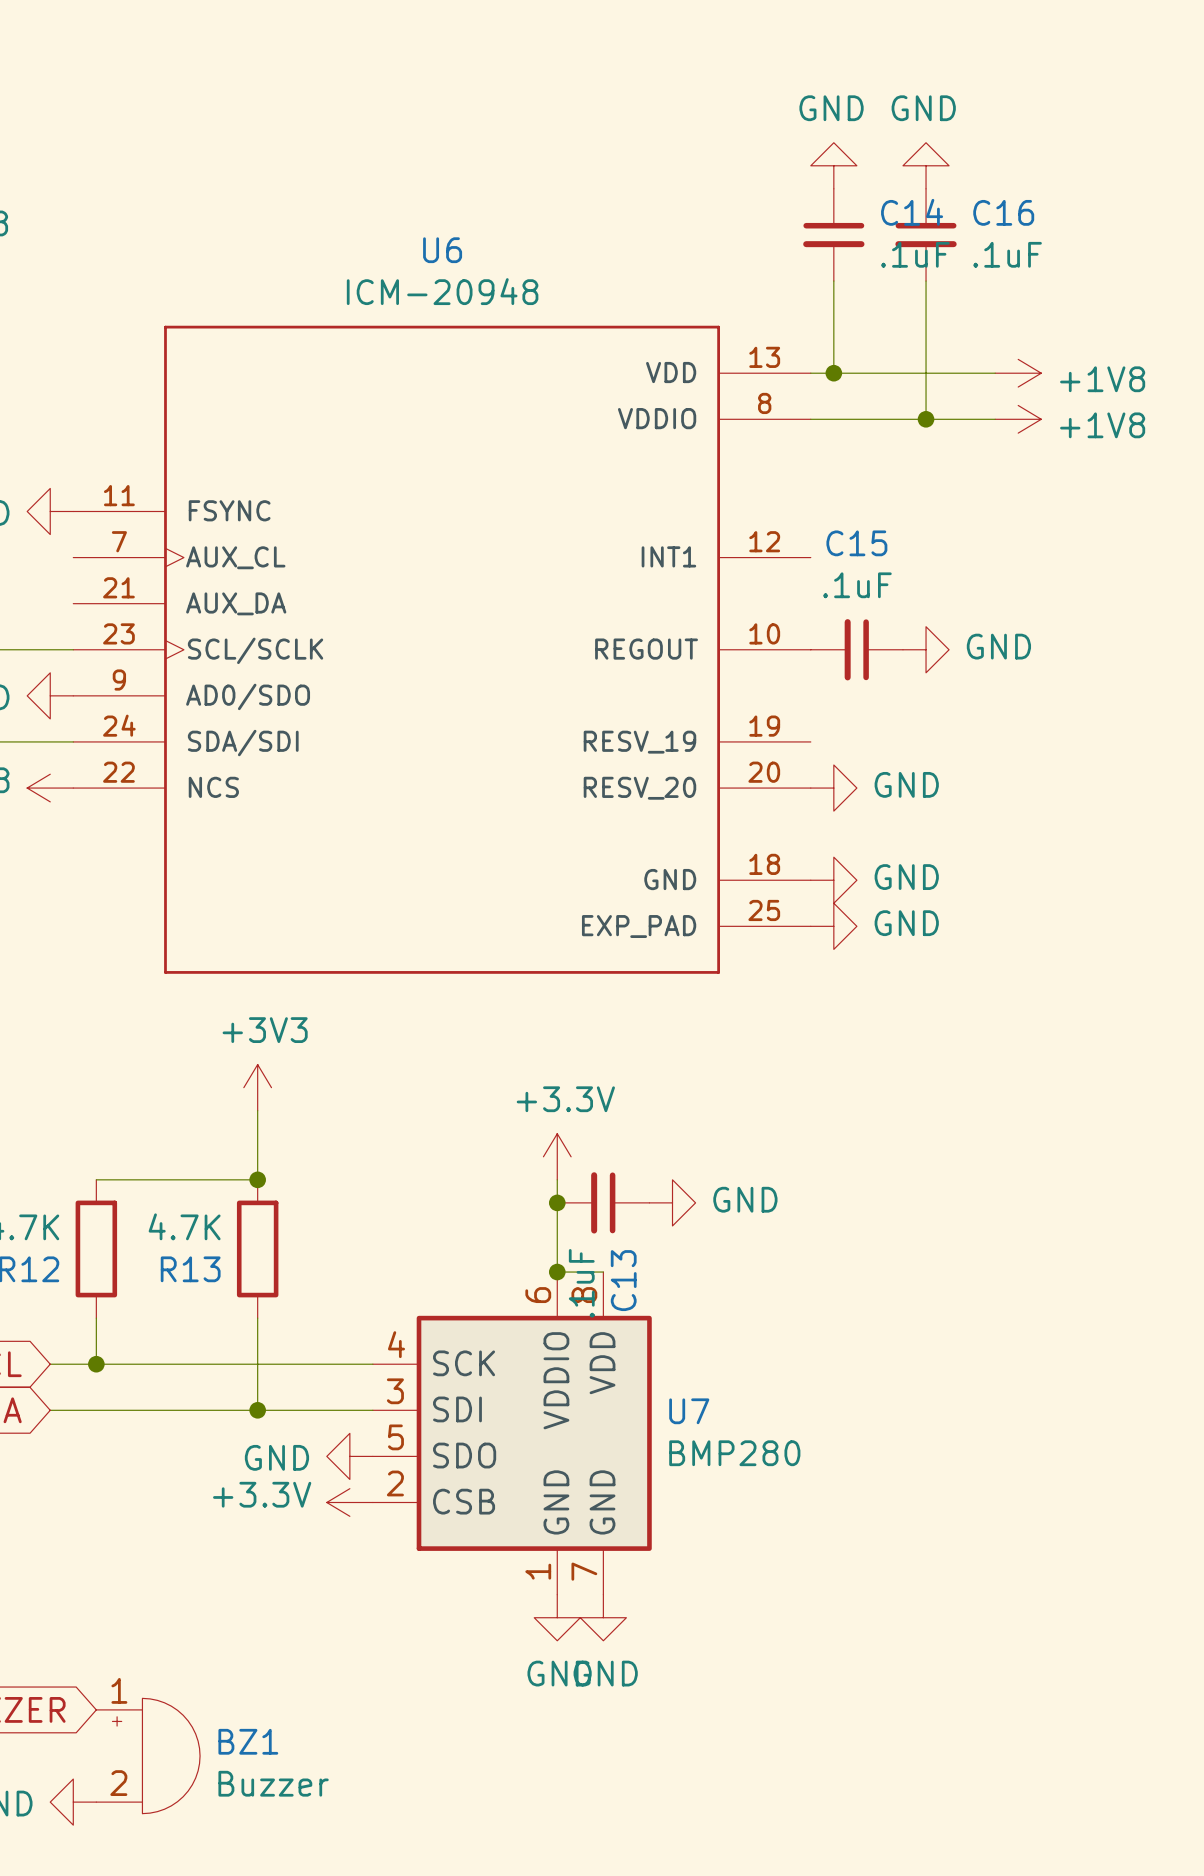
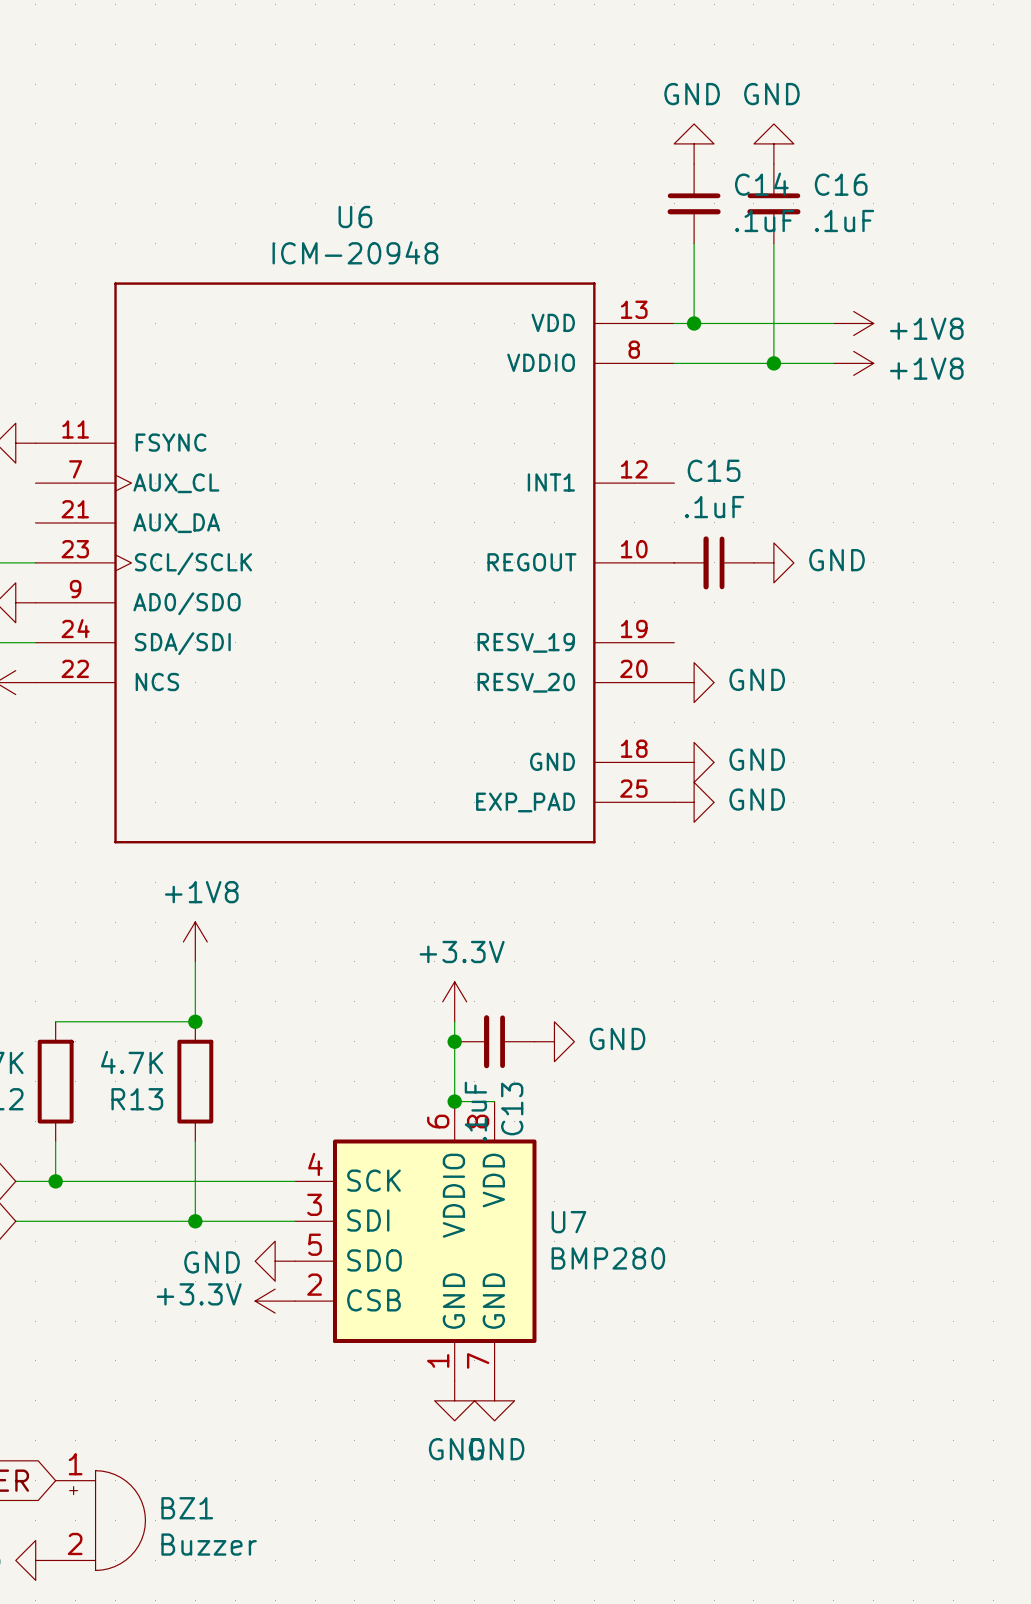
power symbol: +3V3 (257, 1087) -> +1V8 (195, 941)

